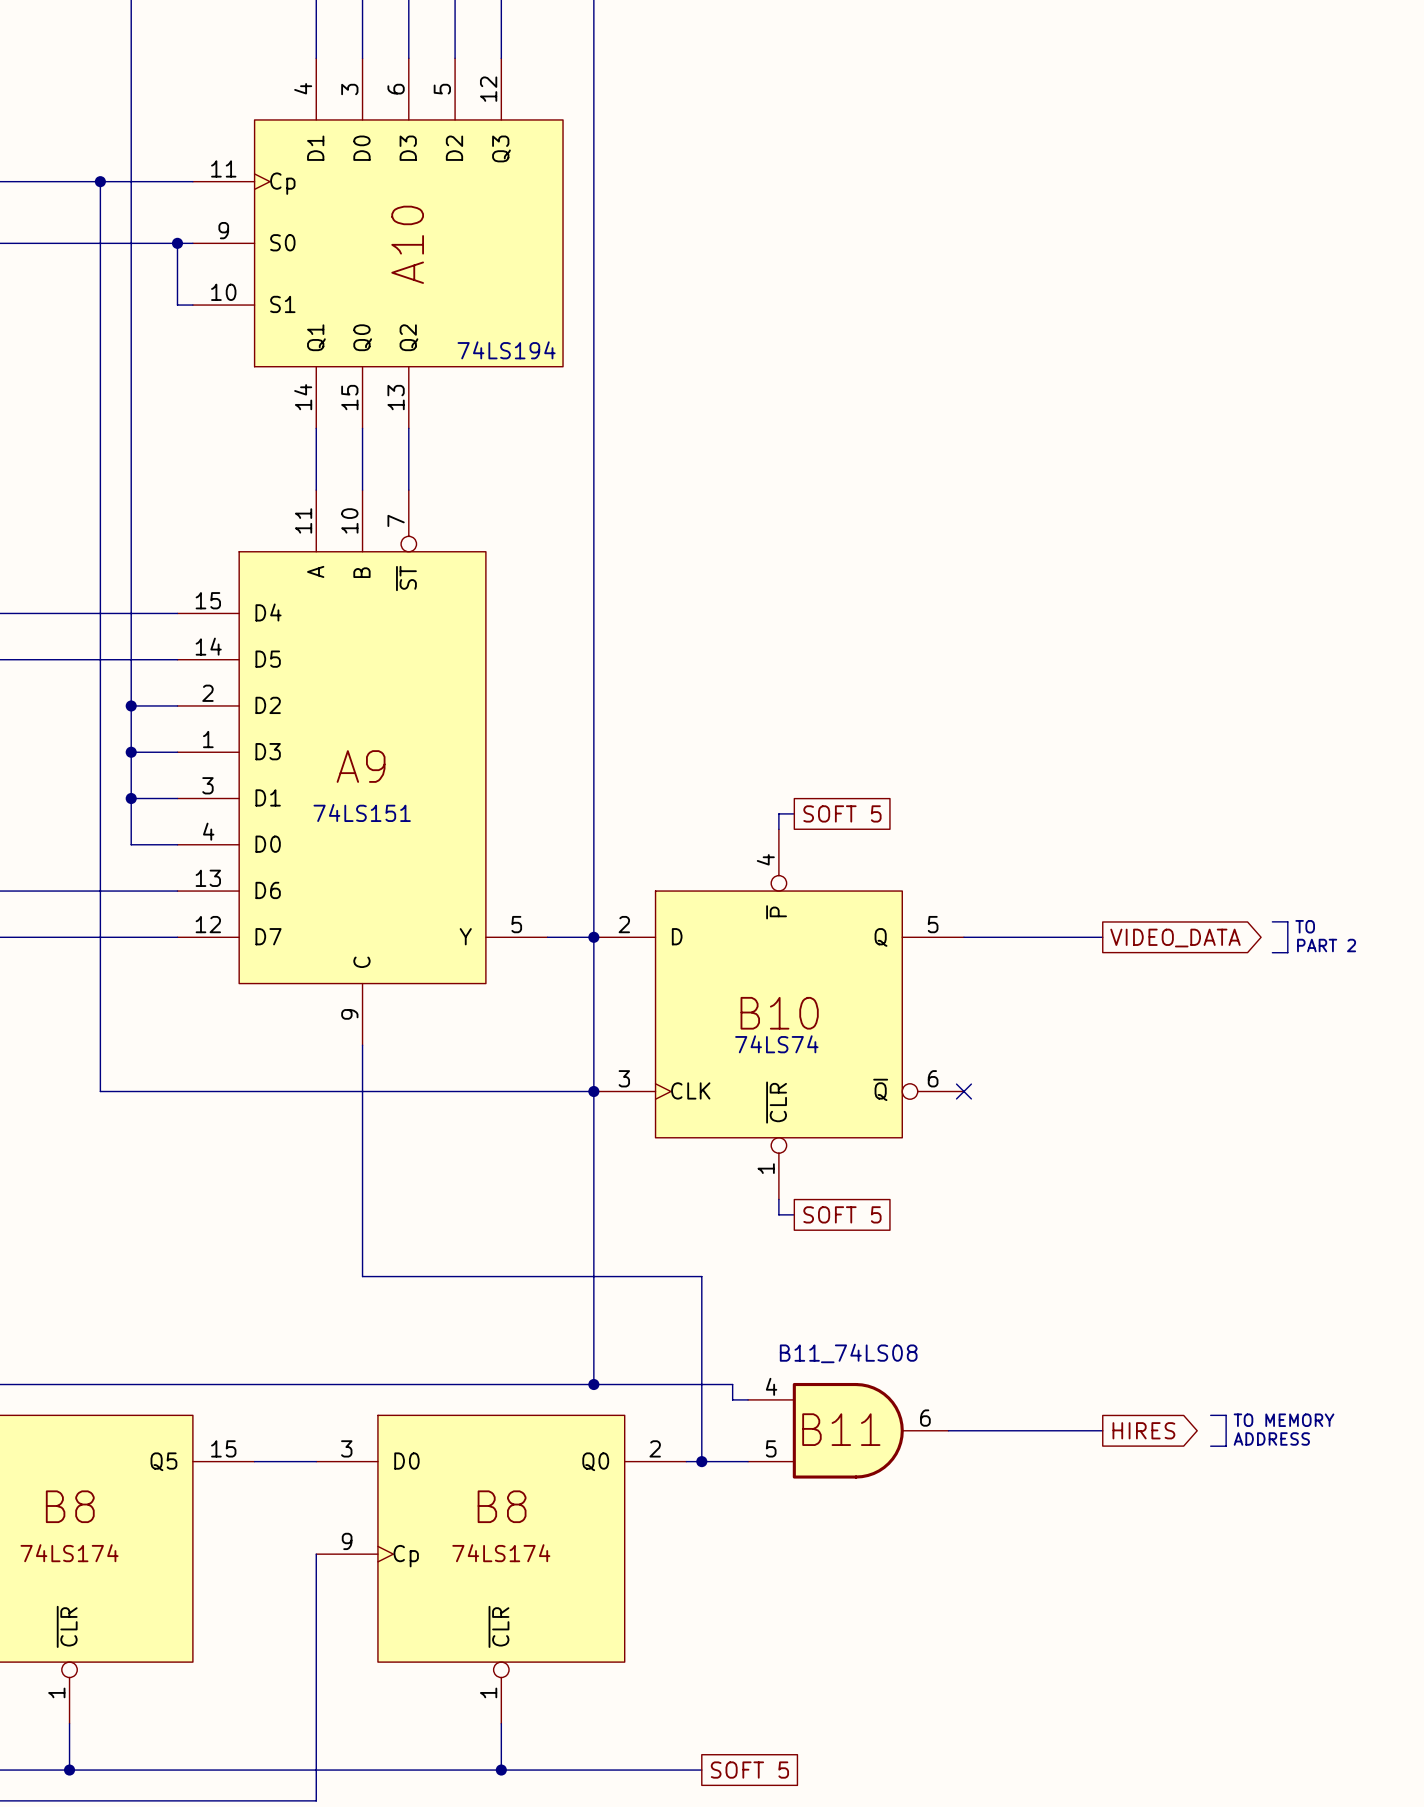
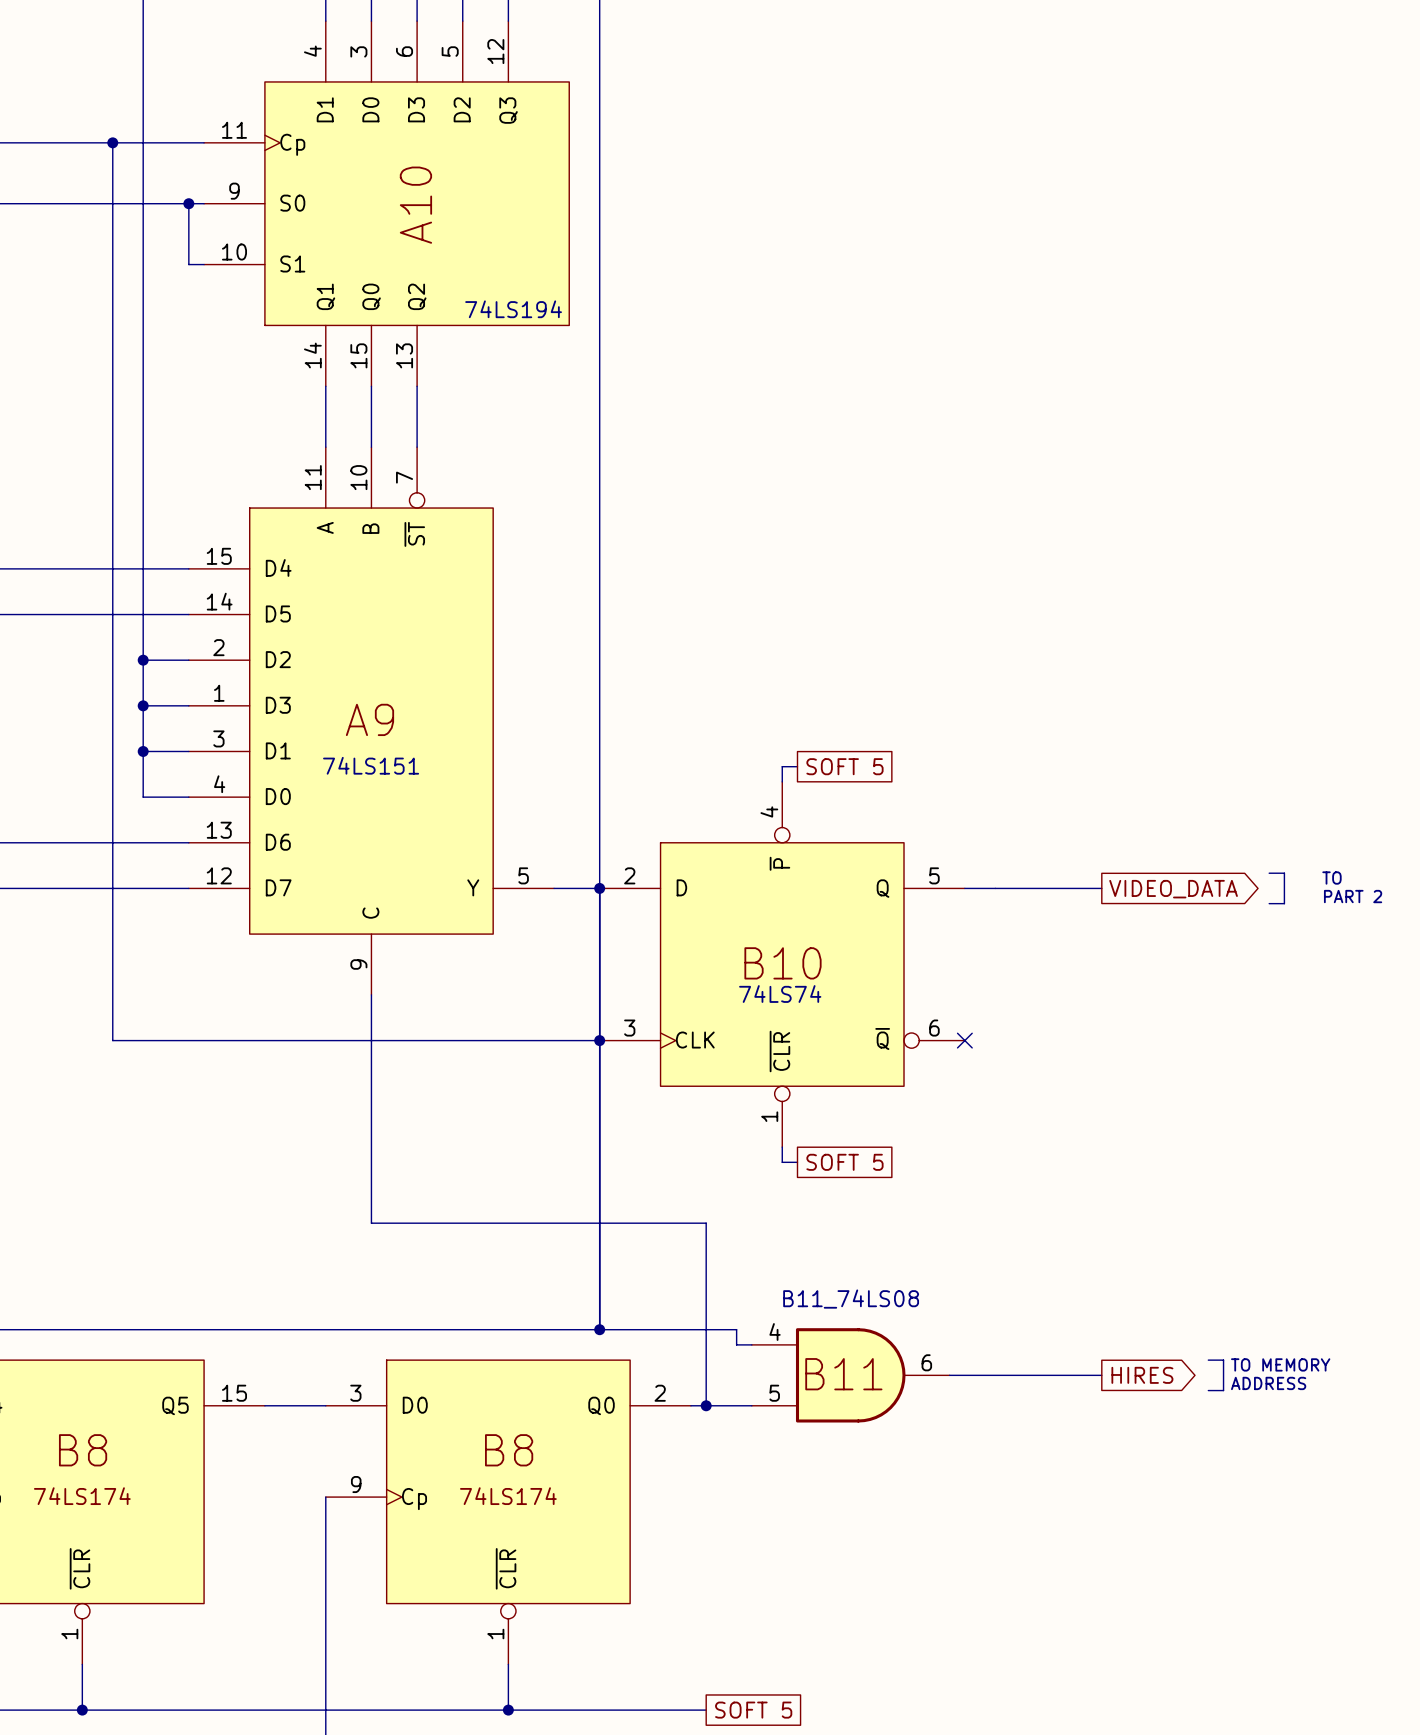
text position: TO (1305, 926) -> TO (1331, 878)
text position: PART 2 (1326, 945) -> PART 2 (1353, 896)

